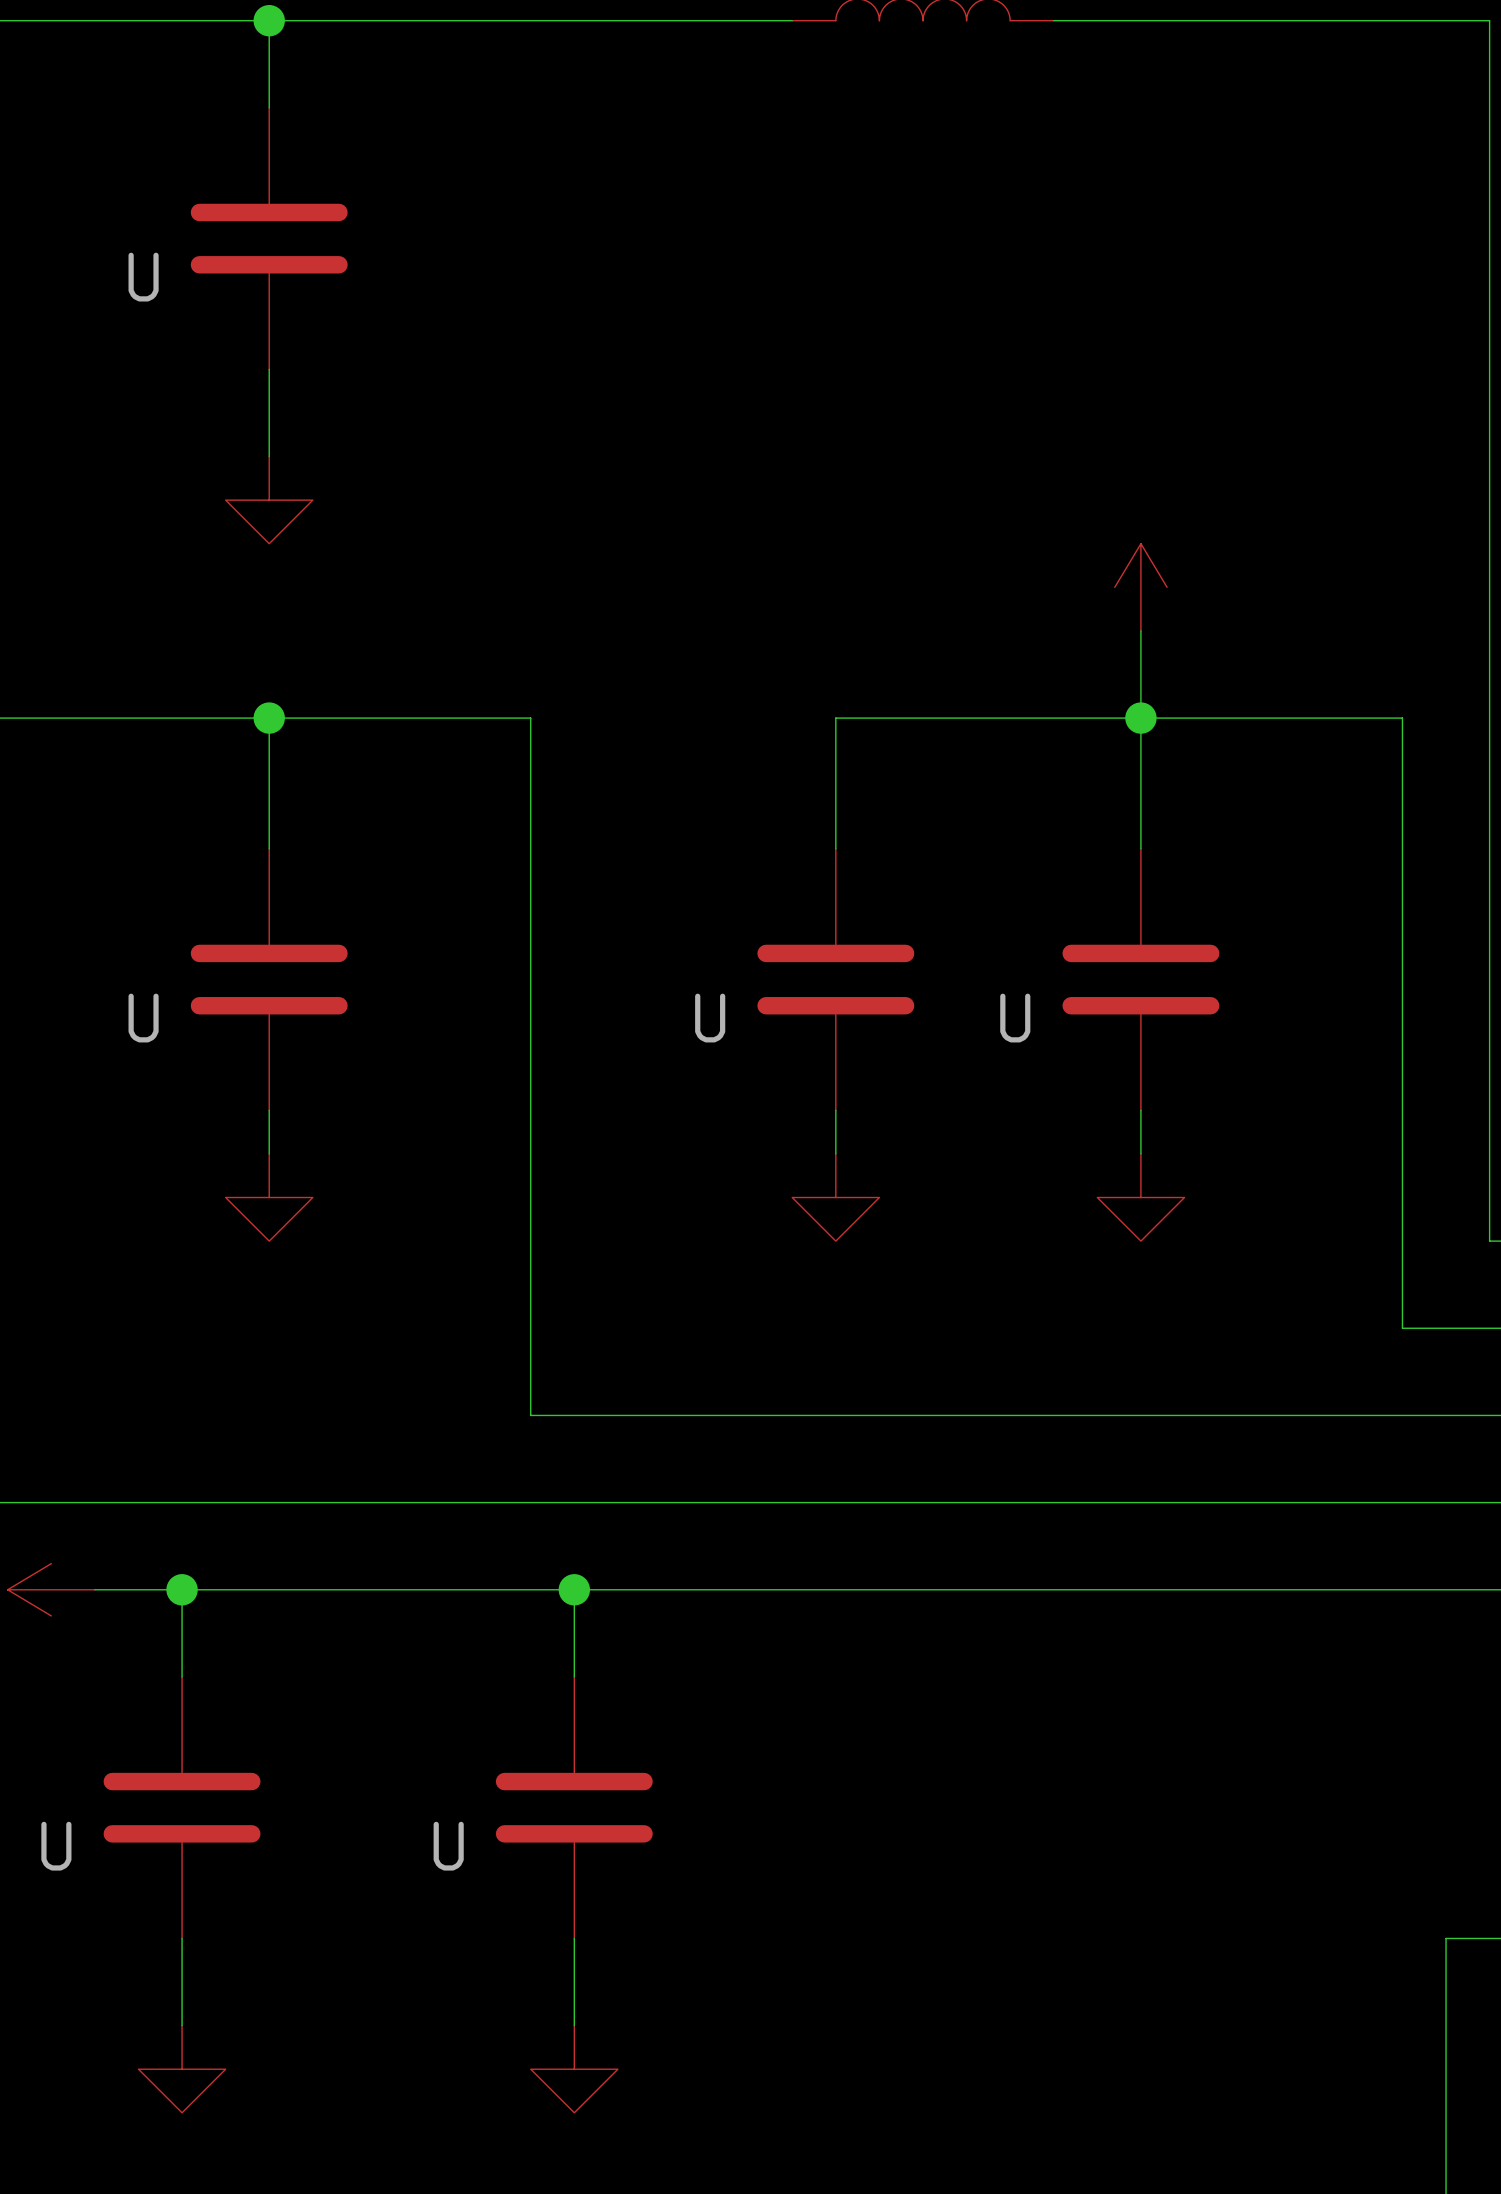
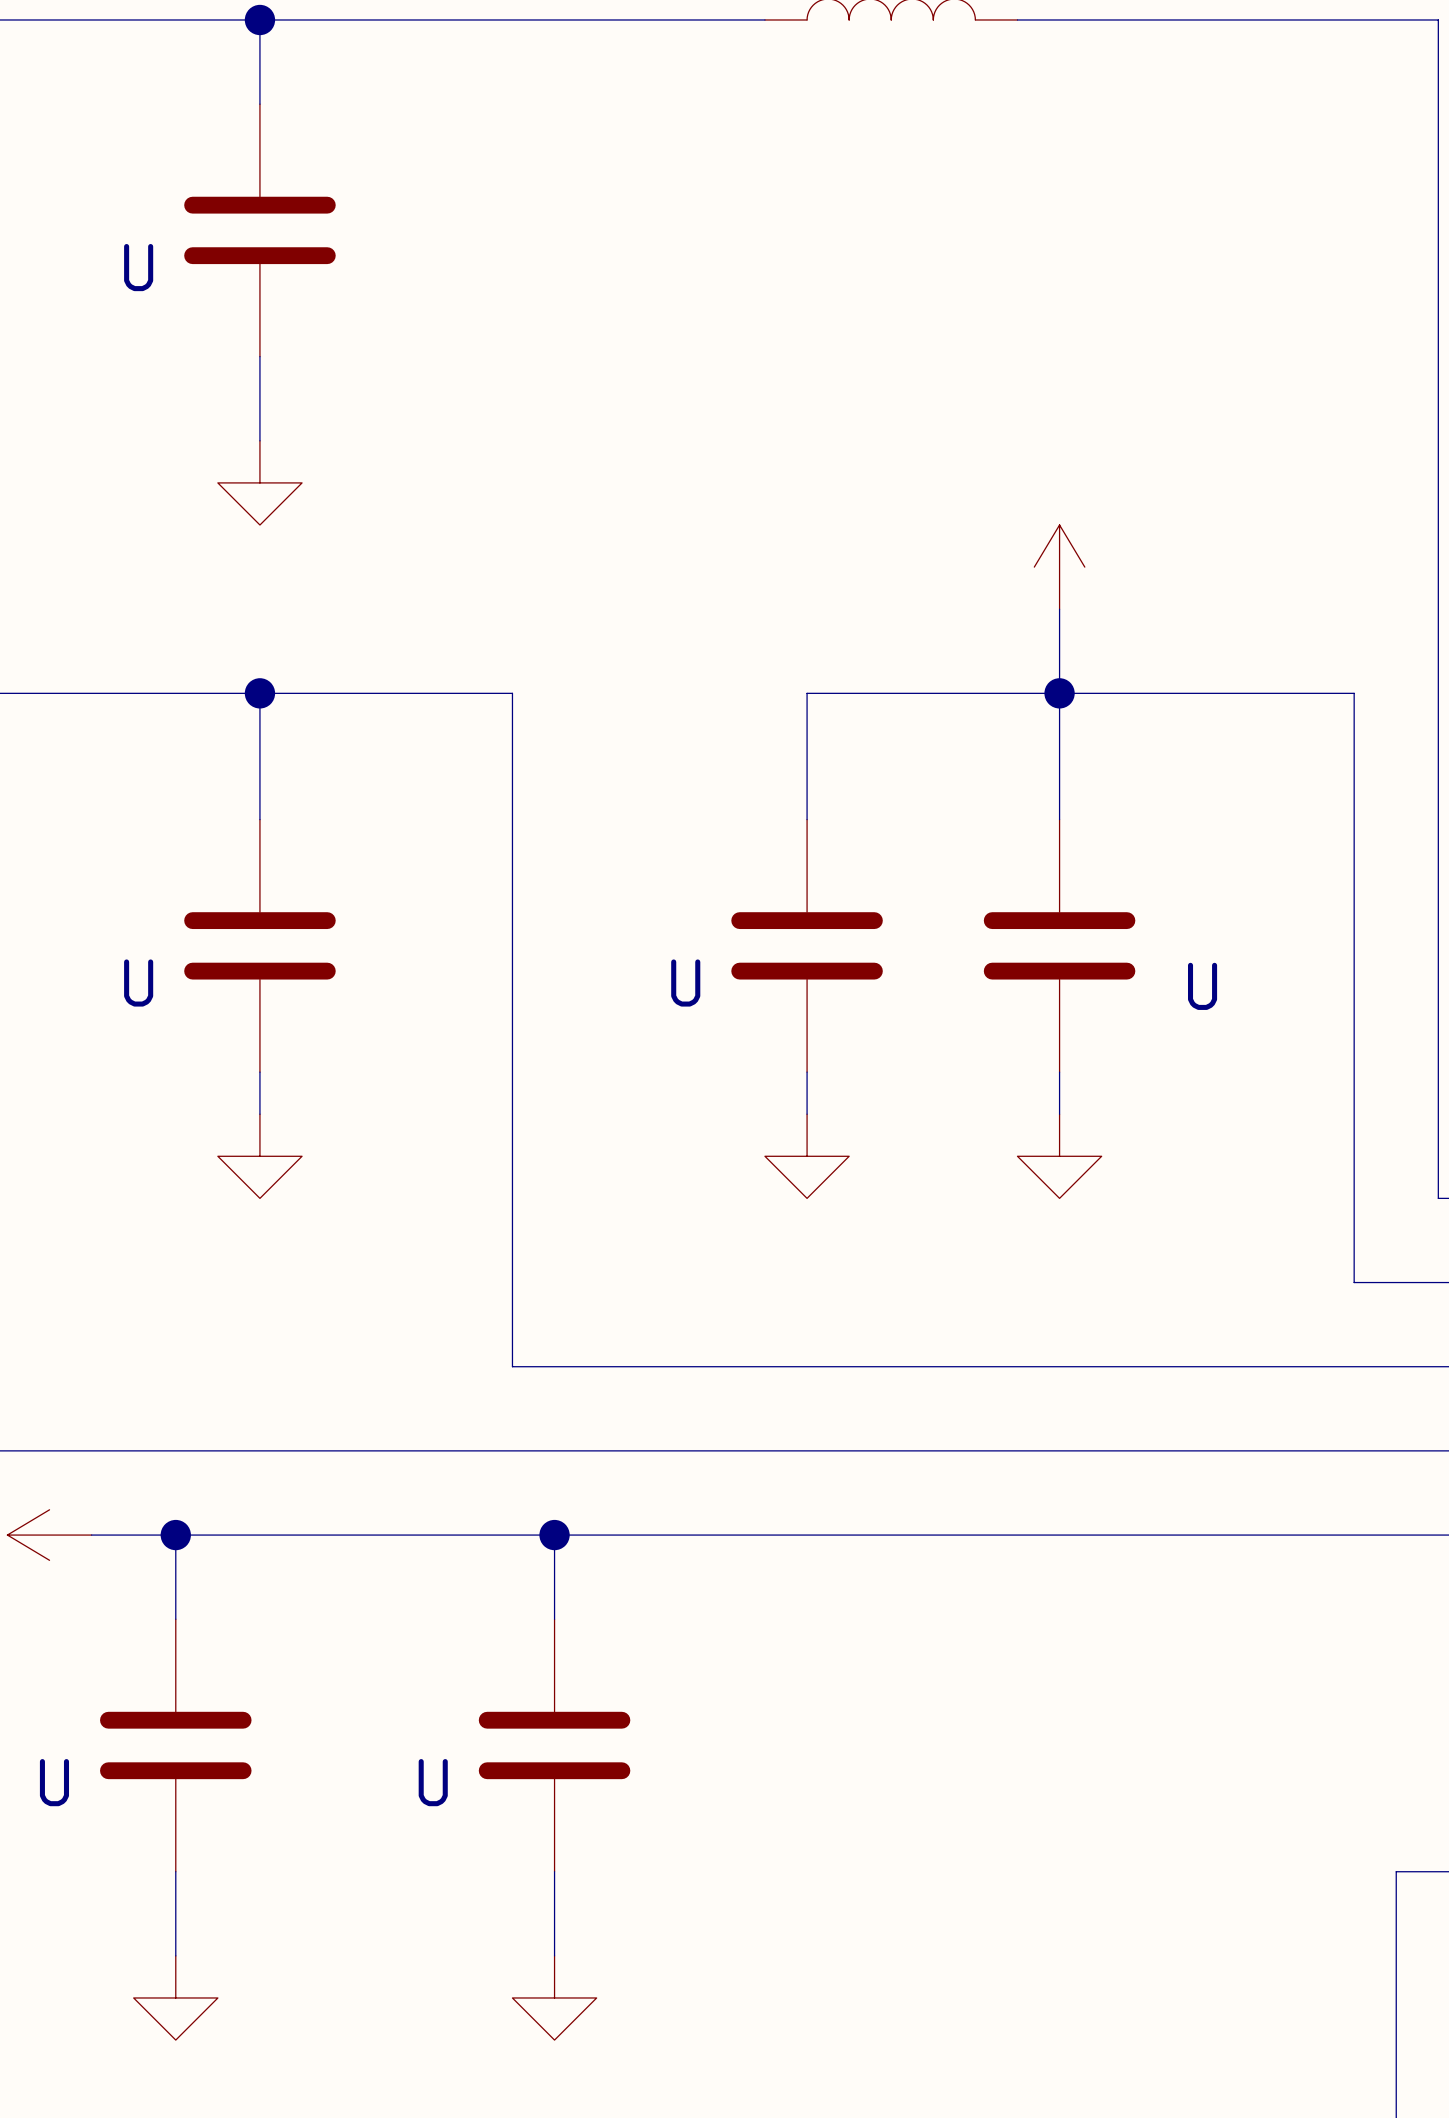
power symbol position: (1140, 587) -> (1059, 567)
wire: (1140, 630) (1140, 848) -> (1059, 609) (1059, 819)
junction position: (1140, 718) -> (1059, 693)
U position: (1140, 979) -> (1059, 945)
U name position: U (1015, 1018) -> U (1202, 986)
wire: (1140, 1110) (1140, 1153) -> (1059, 1072) (1059, 1114)
power symbol position: (1140, 1197) -> (1059, 1156)

